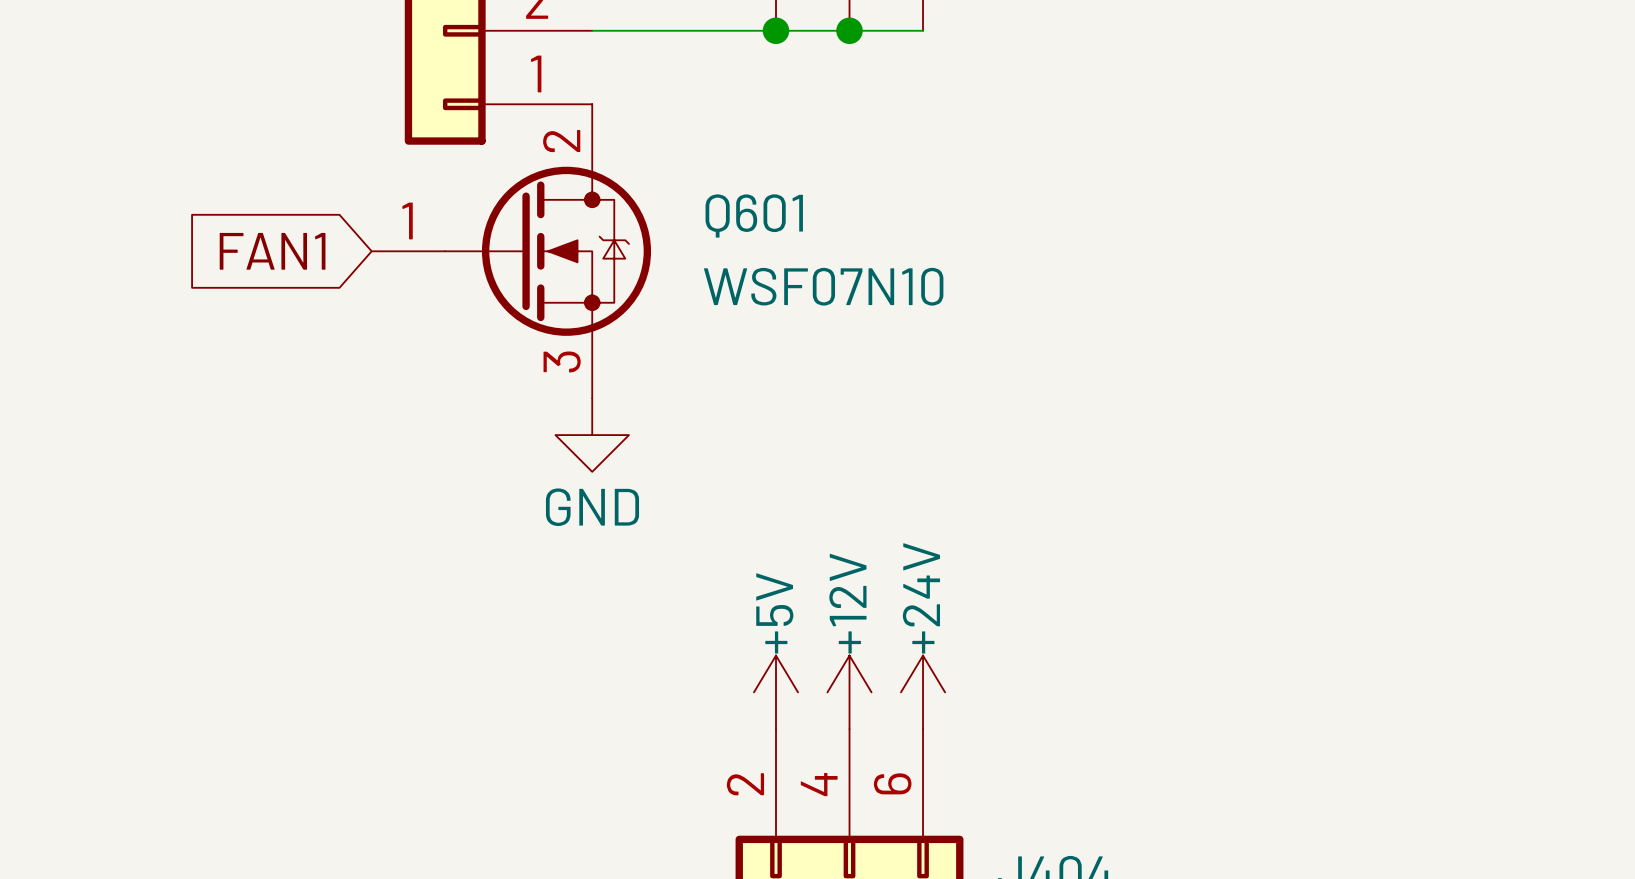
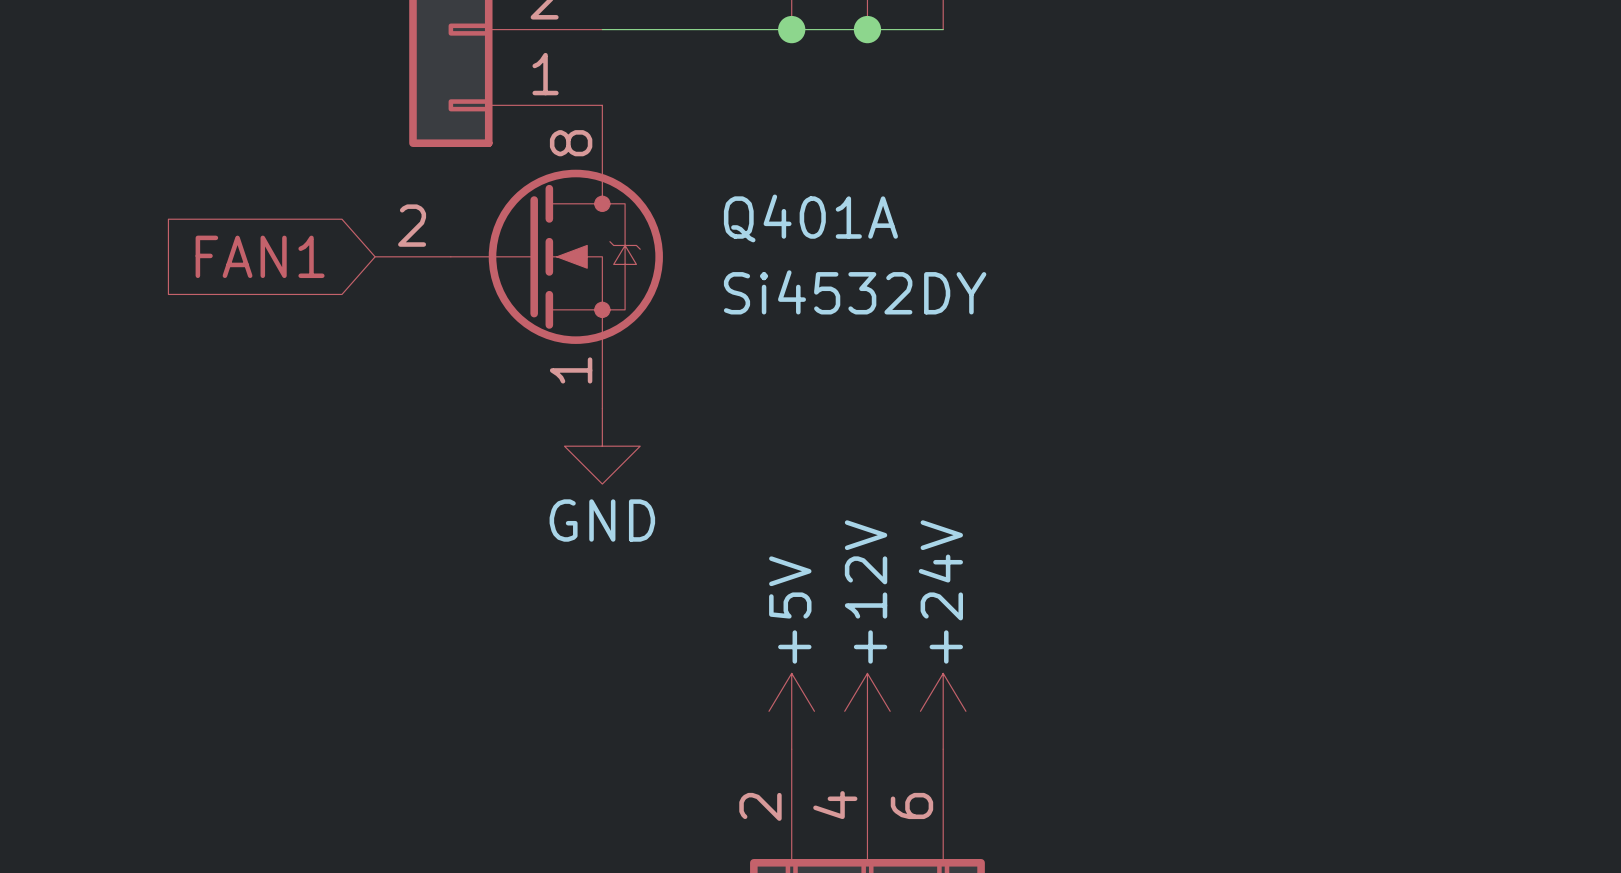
Q601 pin number: 2 (561, 141) -> 8 (571, 143)
Q601 name: Q601 (754, 215) -> Q401A (810, 218)
Q601 pin number: 1 (407, 220) -> 2 (412, 225)
Q601 value: WSF07N10 (823, 286) -> Si4532DY (855, 292)
Q601 pin number: 3 (562, 361) -> 1 (571, 370)

